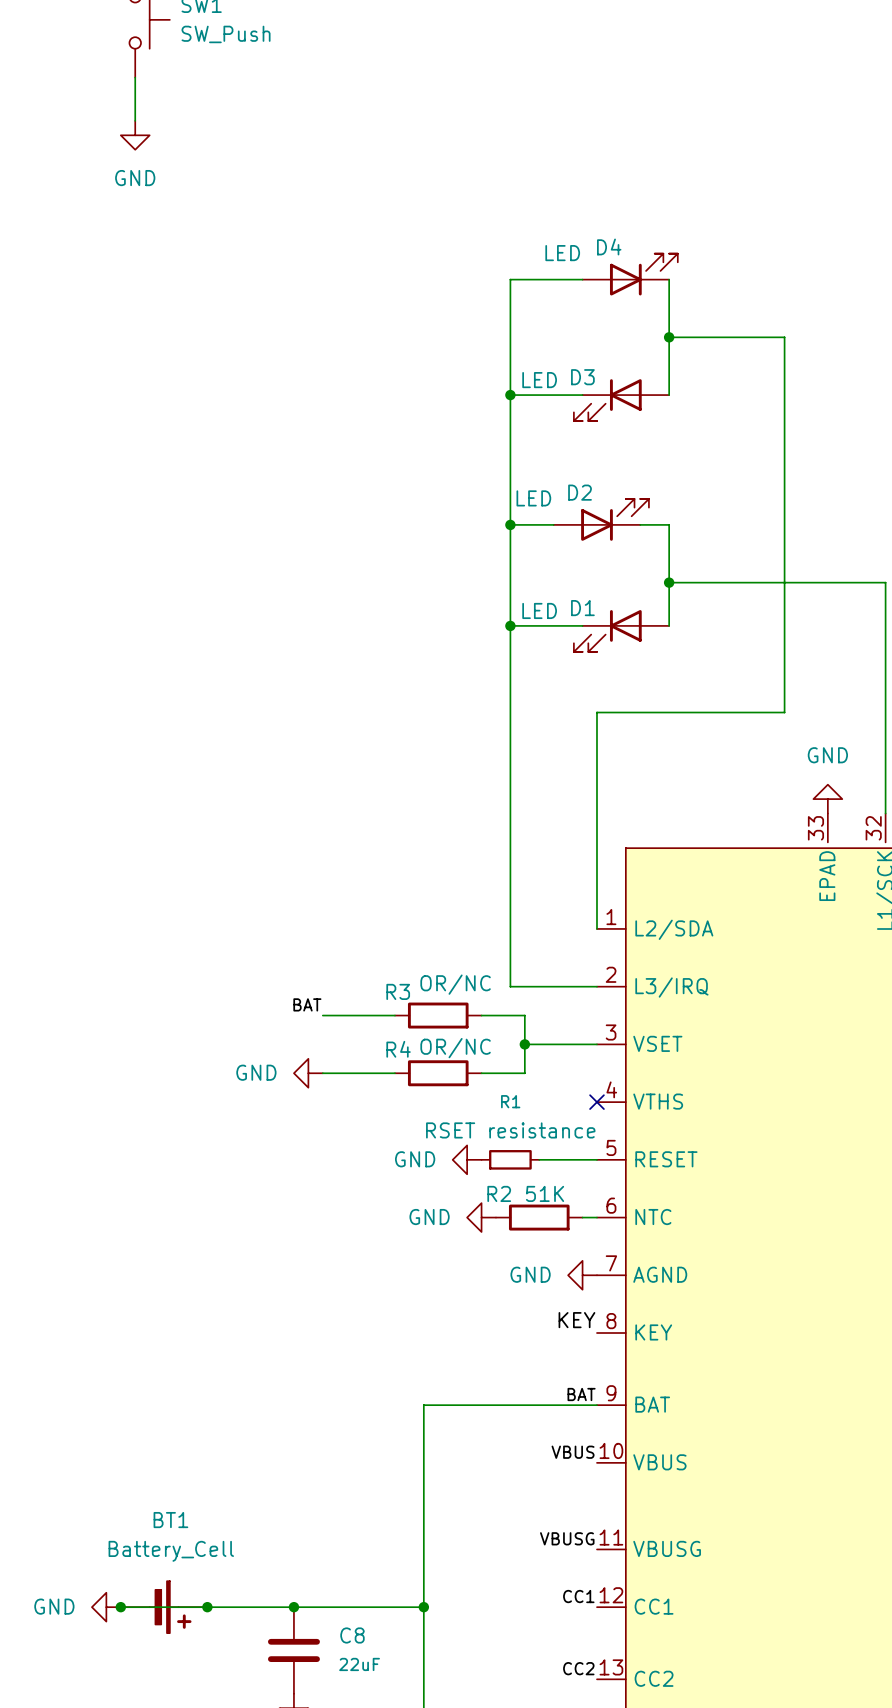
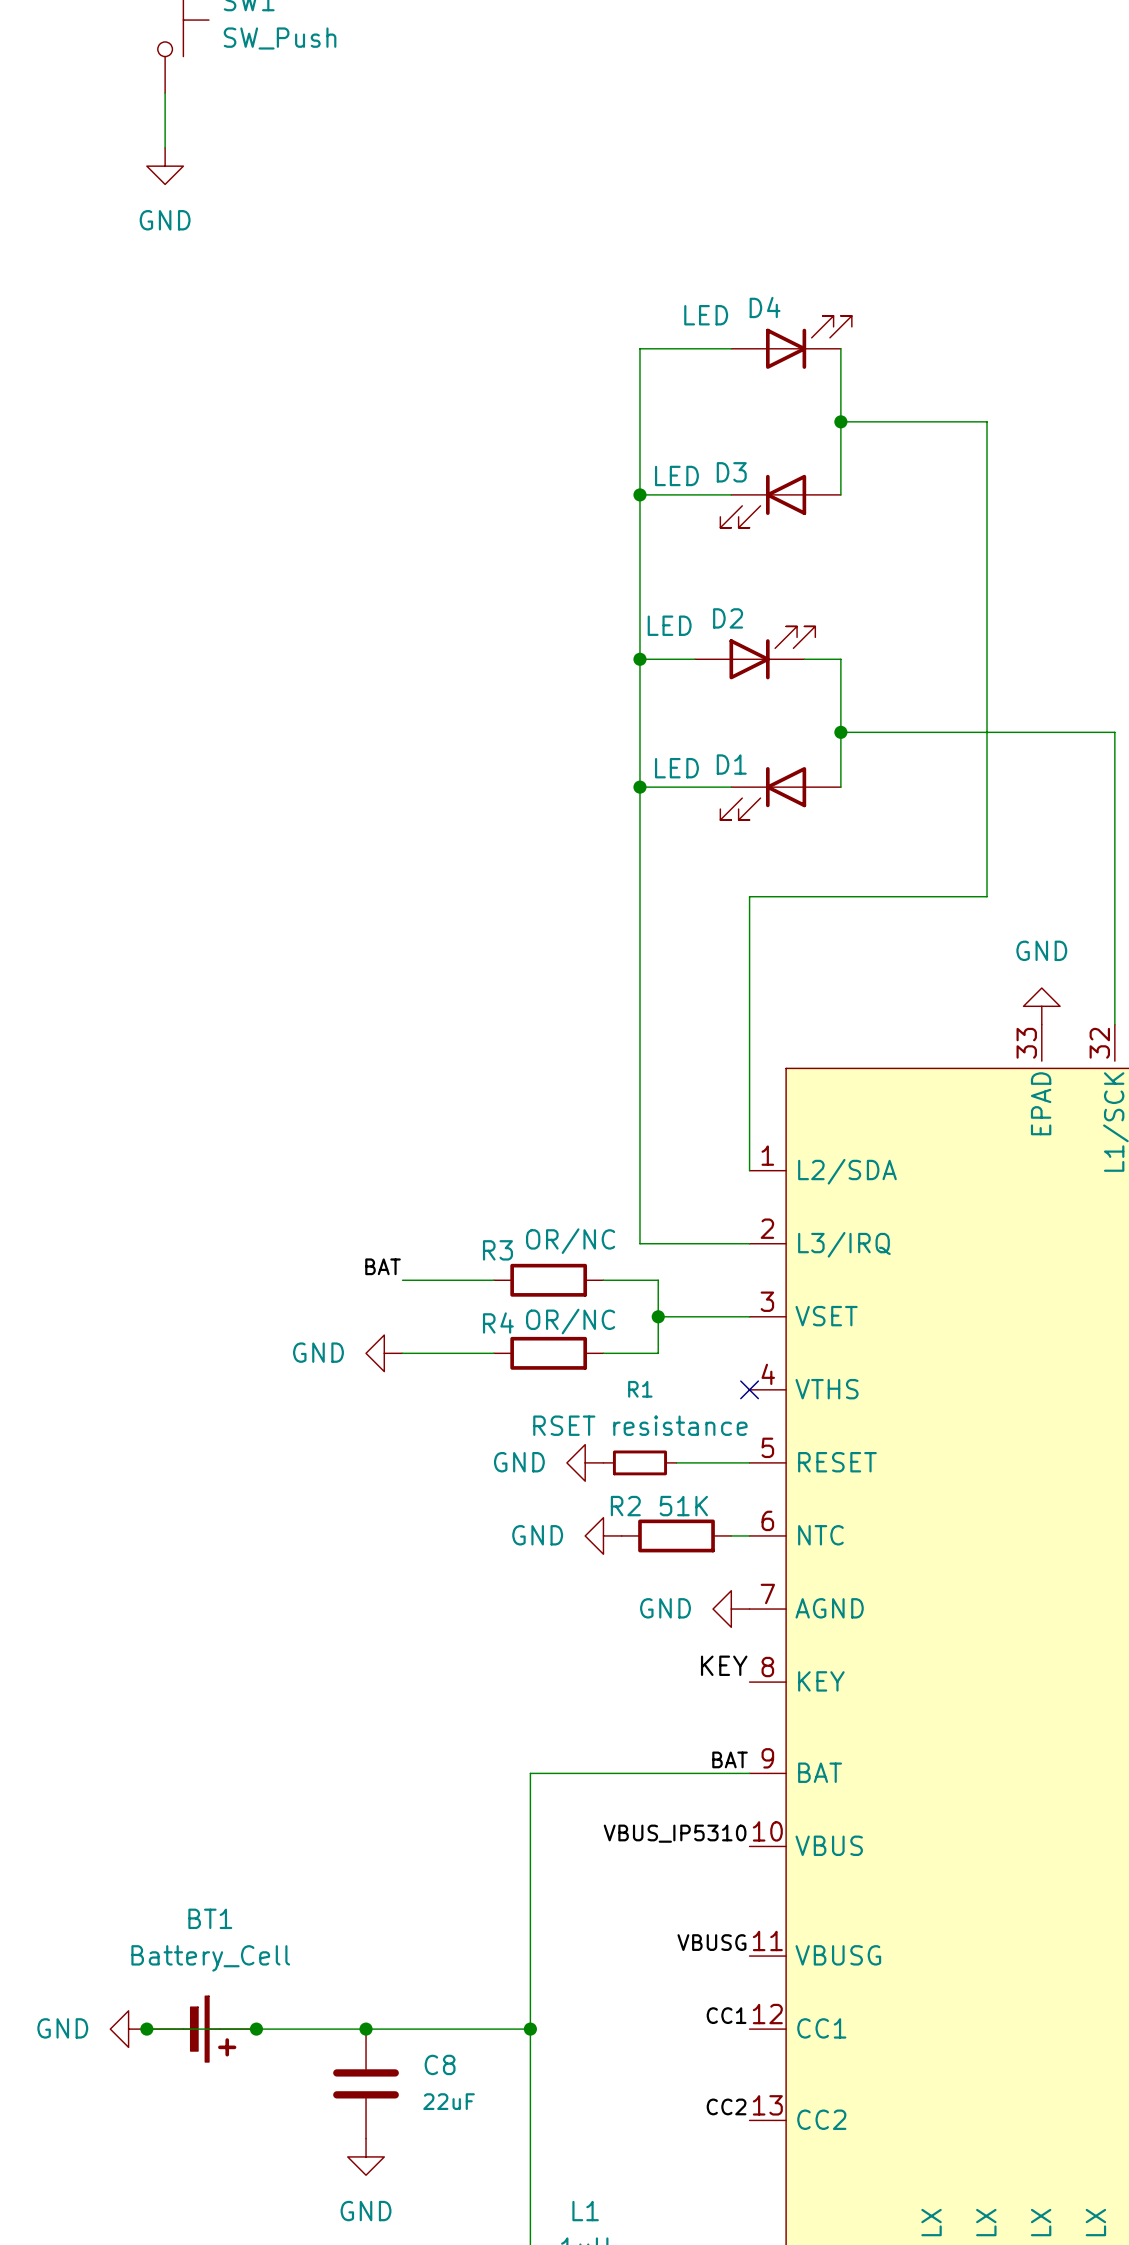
label: VBUS (573, 1452) -> VBUS_IP5310 (675, 1833)

